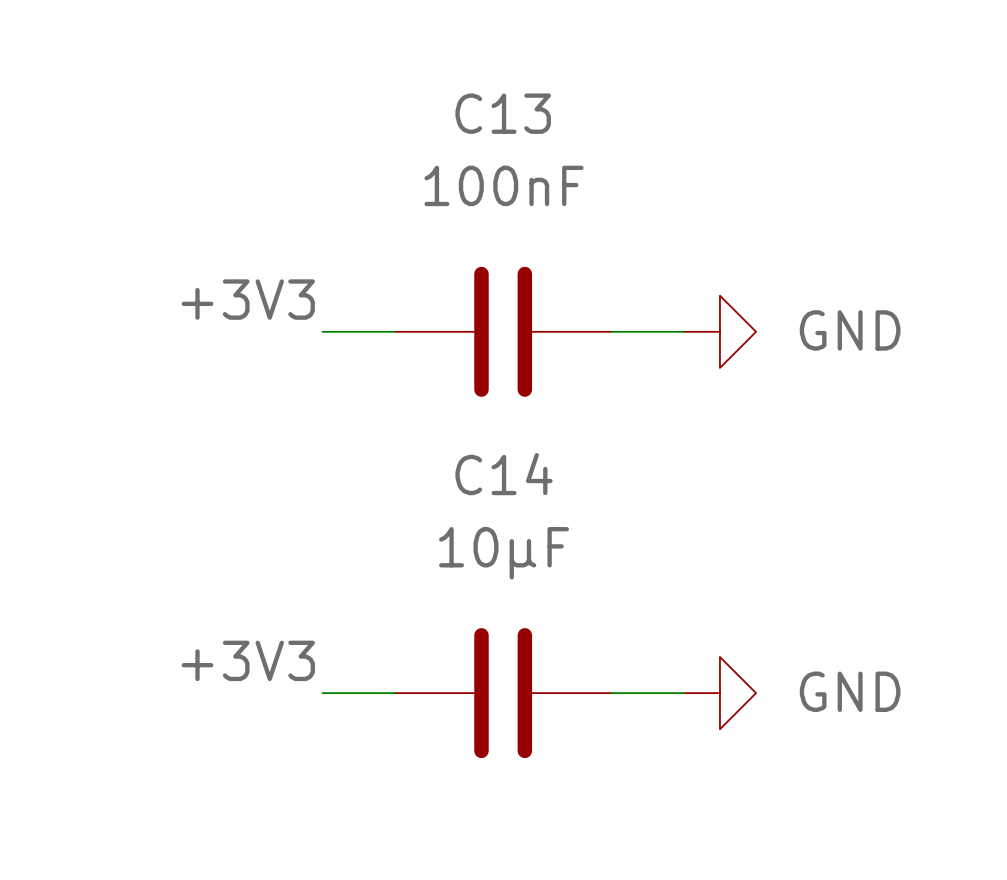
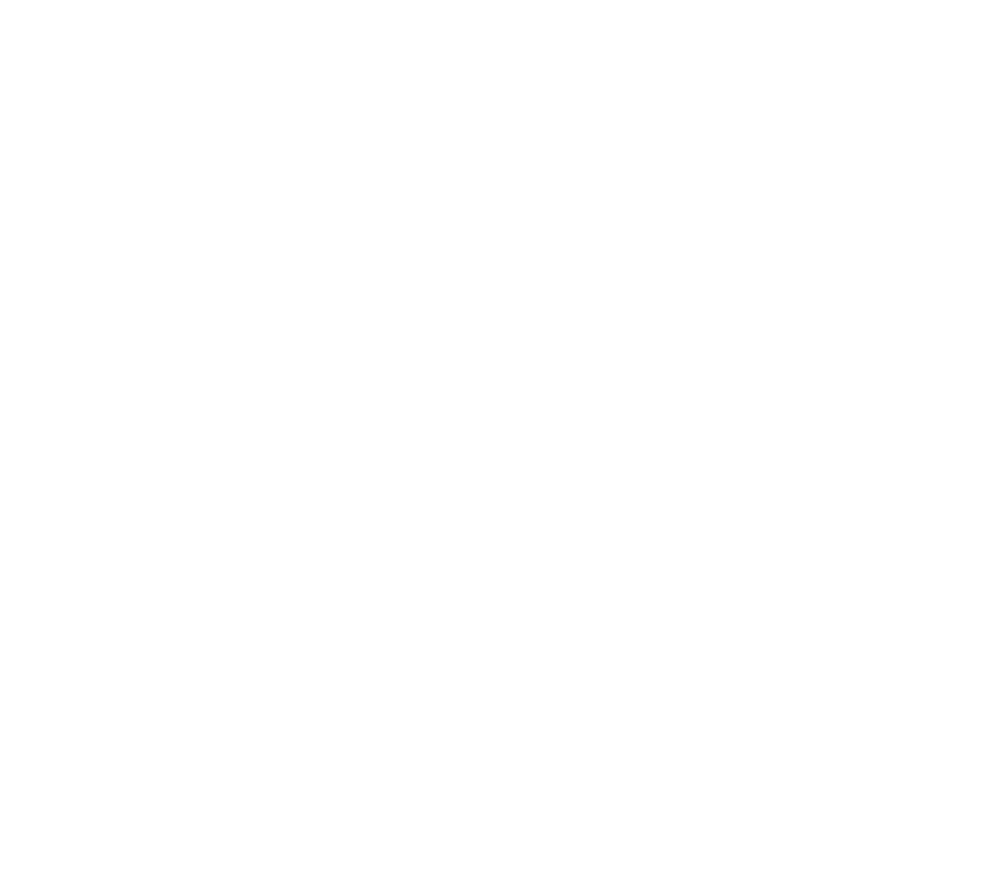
label: +3V3 (248, 299) -> none
wire: (322, 331) (394, 331) -> none
C13: 100nF (503, 331) -> none
wire: (611, 331) (683, 331) -> none
power symbol: GND (719, 331) -> none
label: +3V3 (248, 660) -> none
wire: (322, 693) (394, 693) -> none
C14: 10µF (503, 693) -> none
wire: (611, 693) (683, 693) -> none
power symbol: GND (719, 693) -> none

